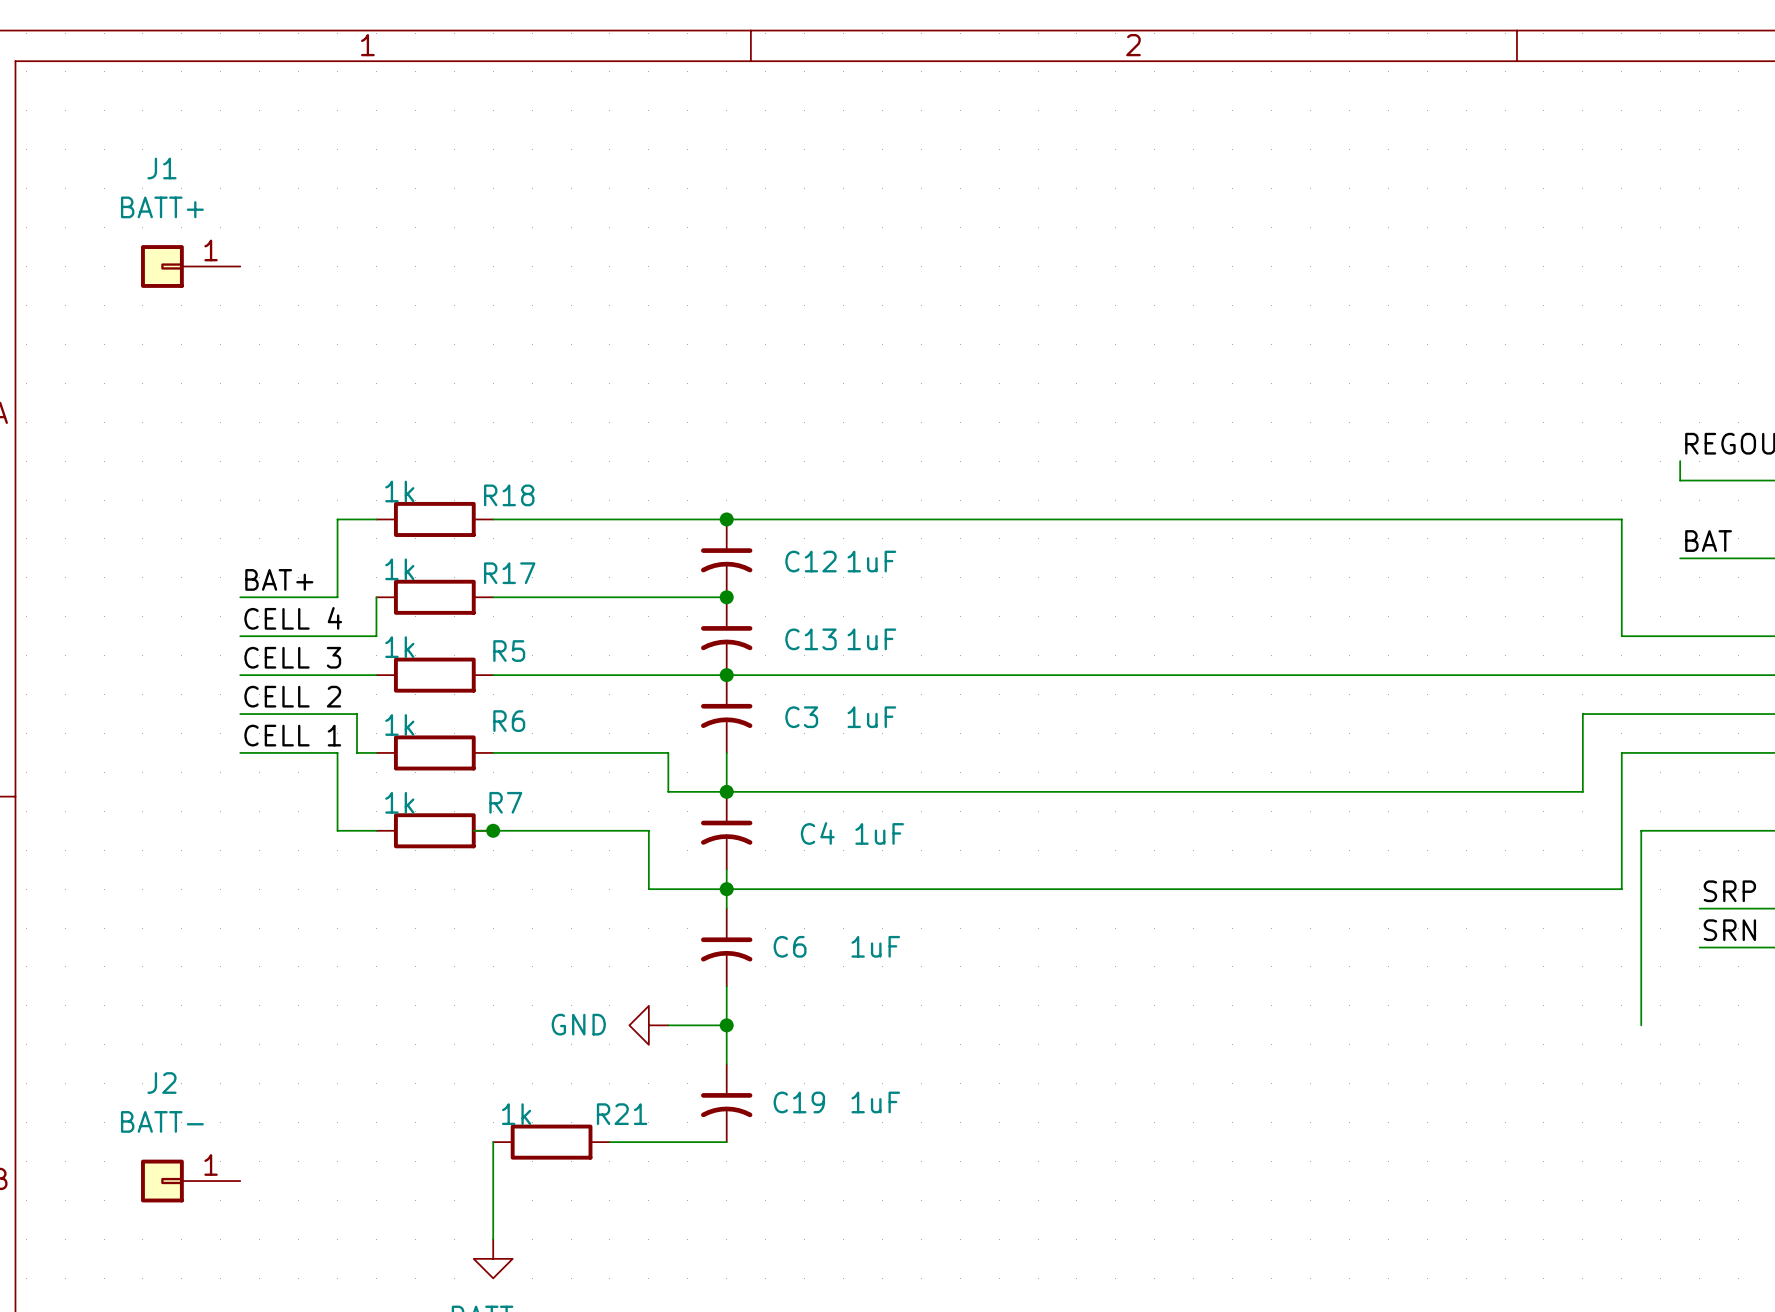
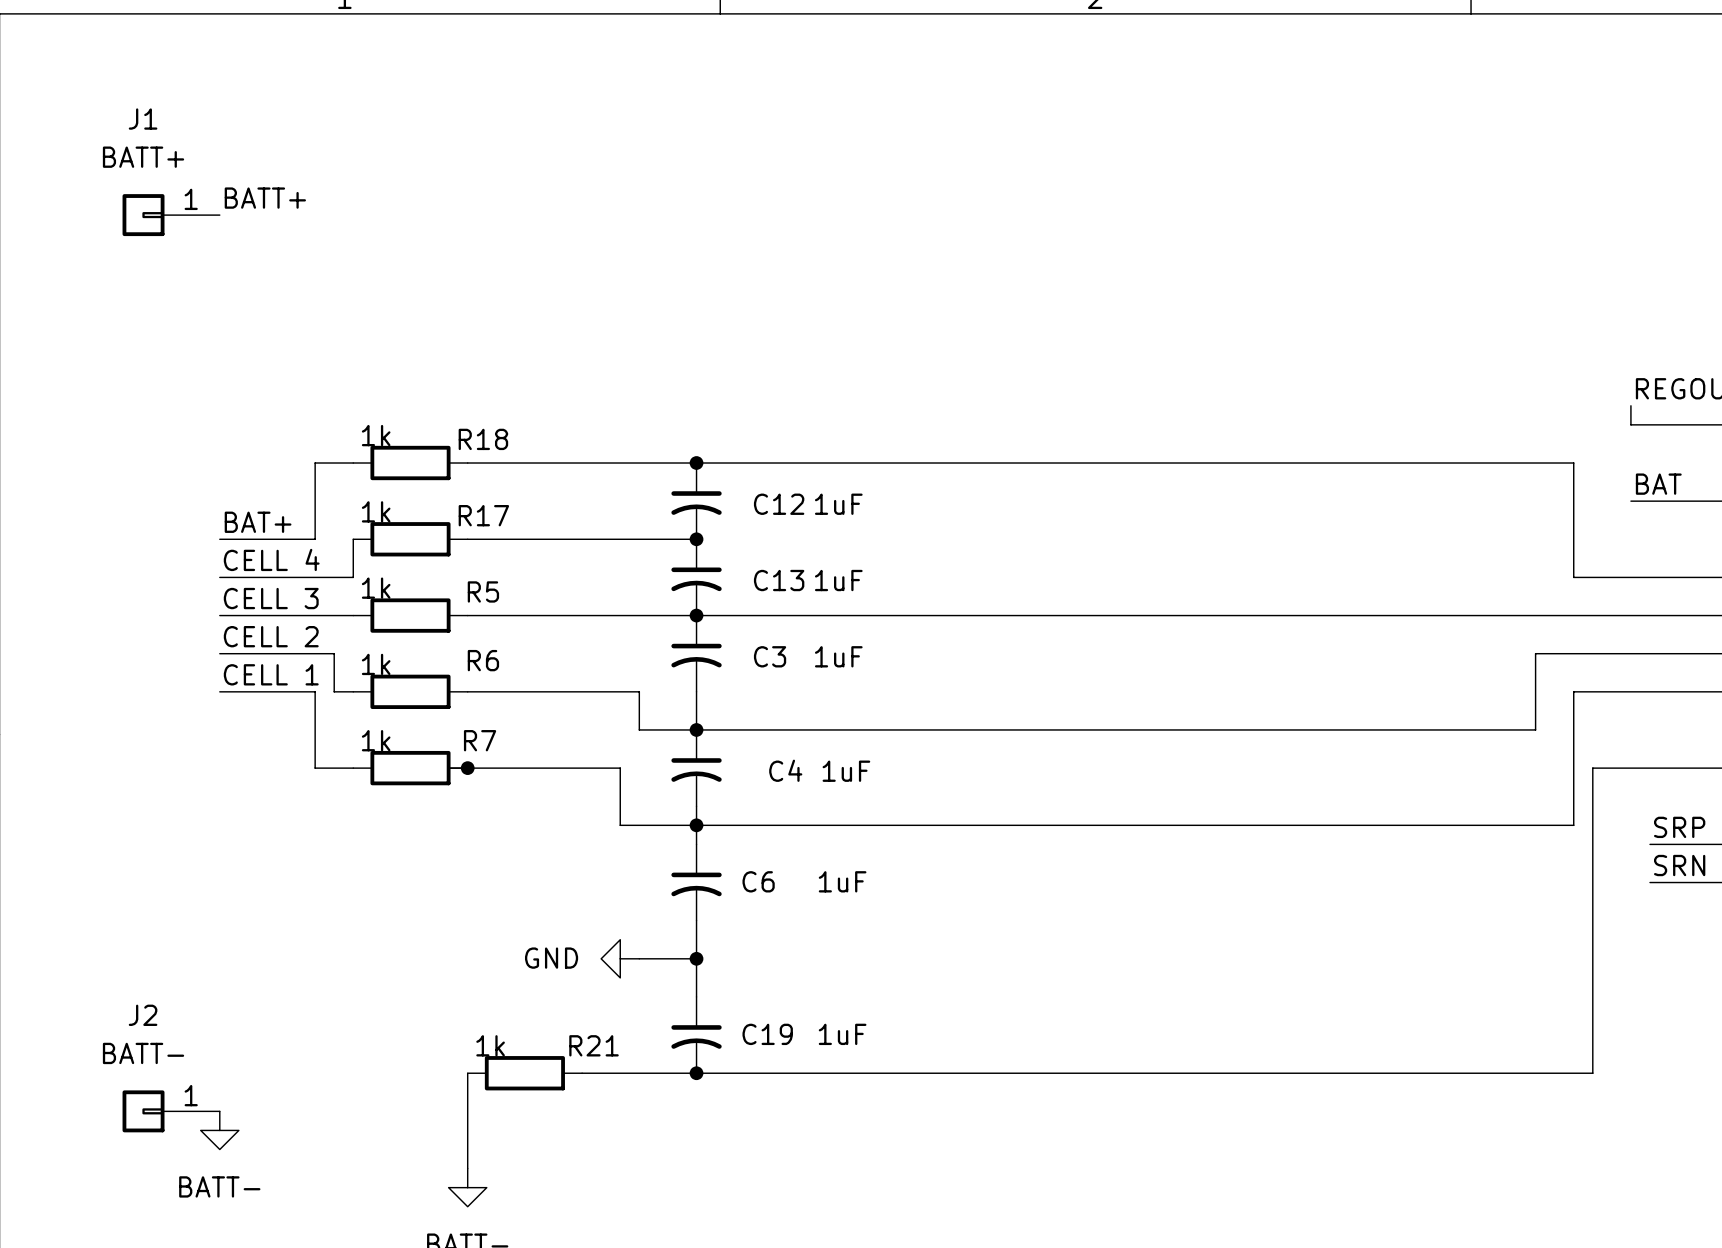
label: none -> BATT+ (265, 198)
wire: none -> (1592, 958) (1592, 1073) (696, 1073)
junction: none -> (696, 1073)
power symbol: none -> BATT- (219, 1130)

